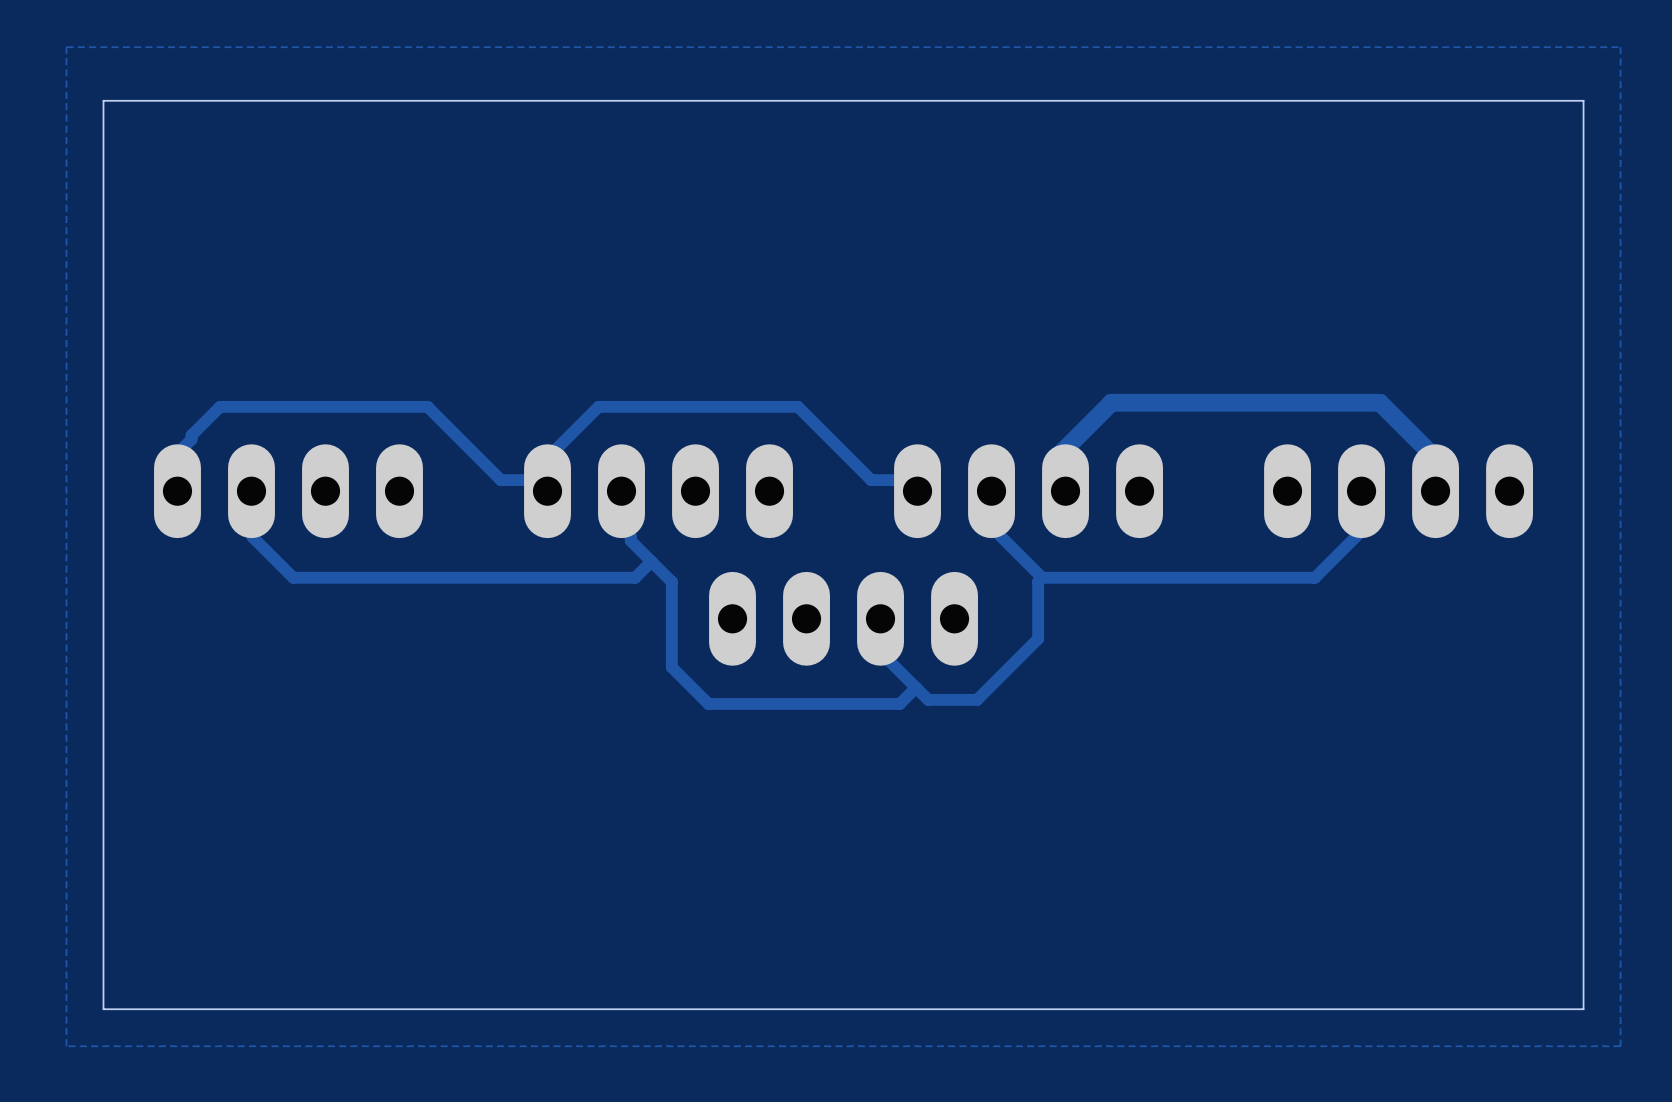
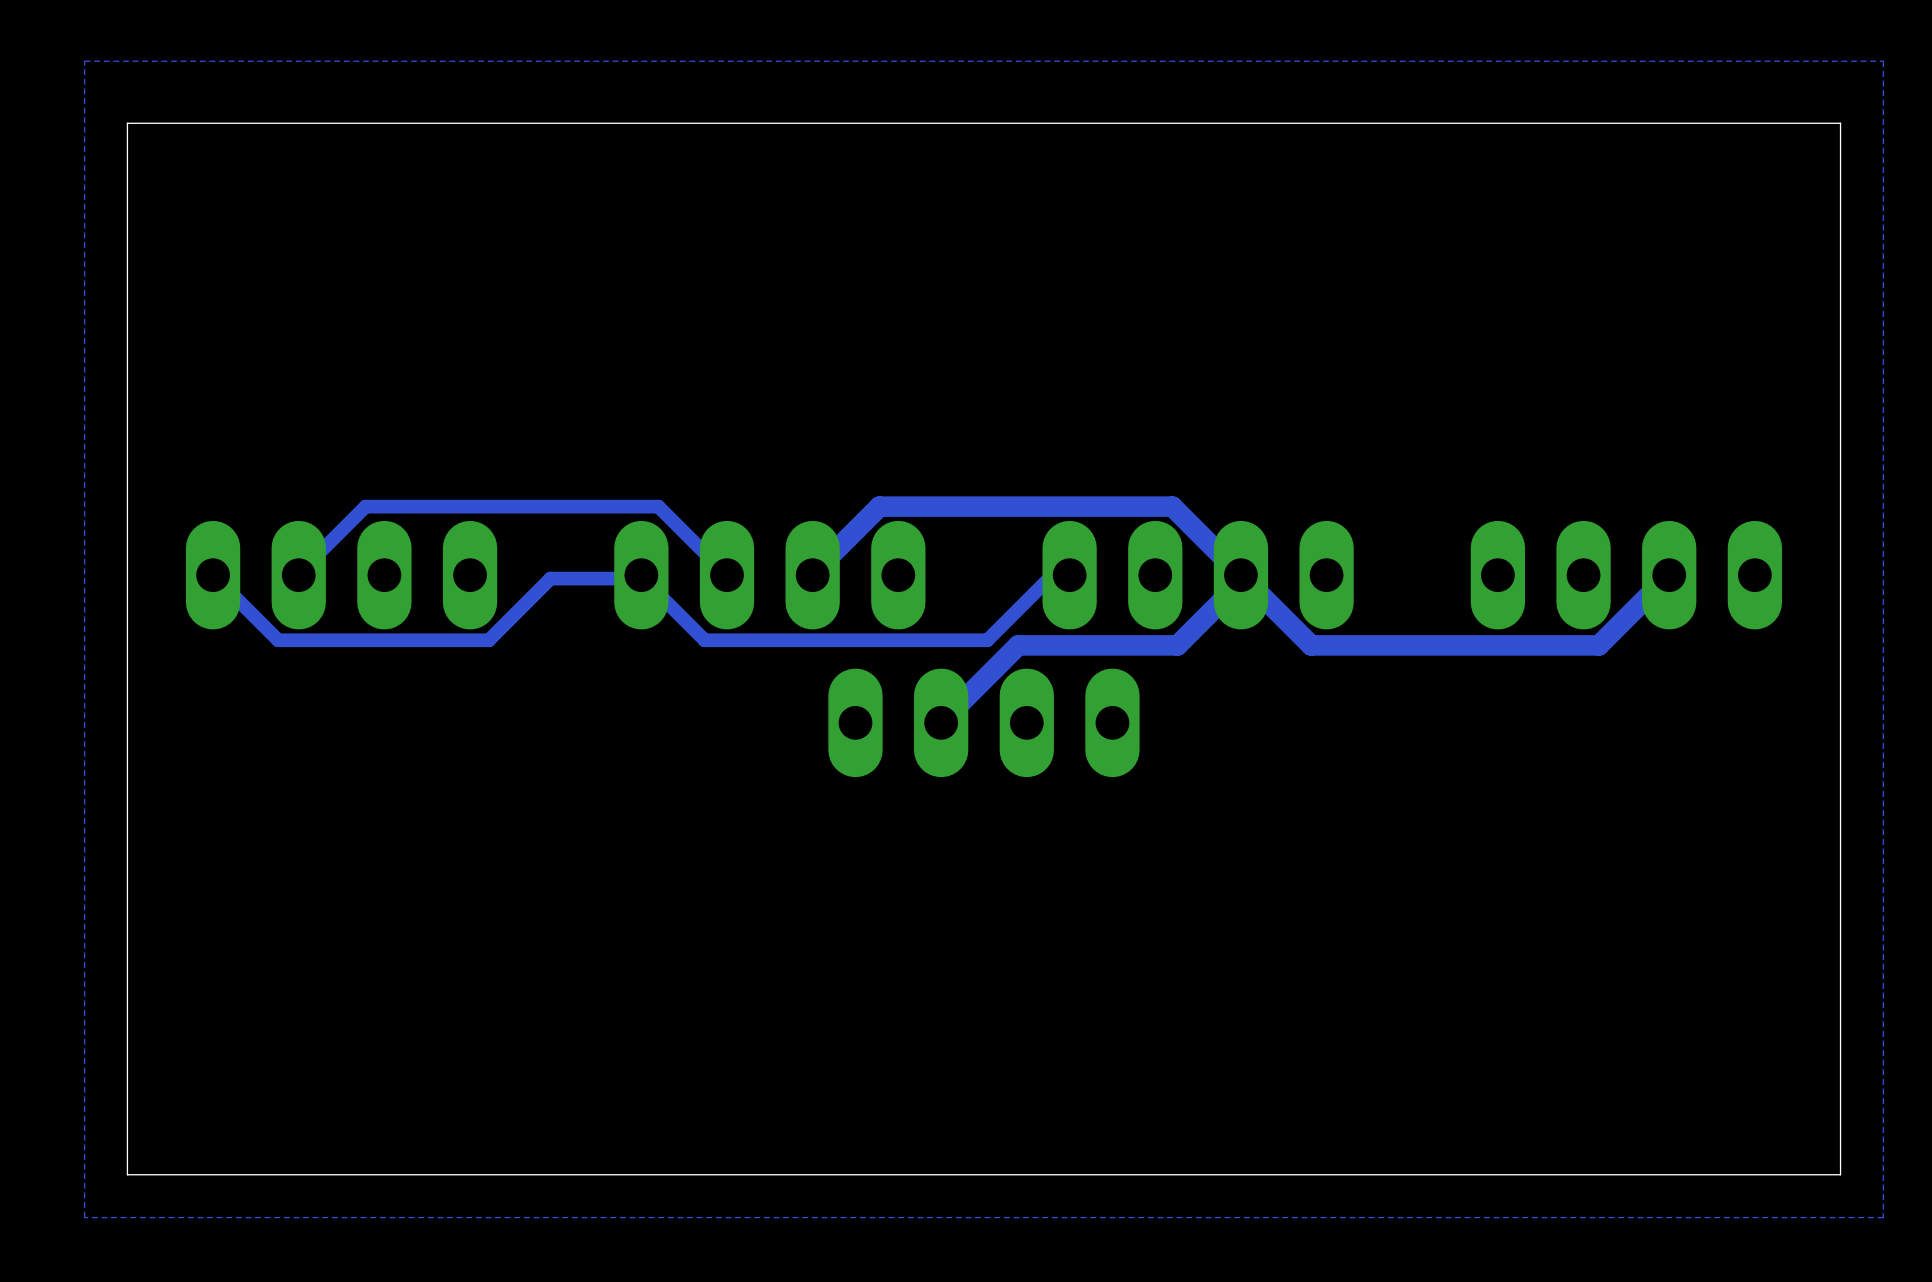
track: (1062, 488) (1062, 451) (1111, 402) (1380, 402) (1432, 455) (1432, 488) (1435, 491) -> (941, 722) (1018, 645) (1177, 645) (1239, 583) (1240, 575) (1311, 645) (1598, 645) (1669, 575)
track: none -> (1237, 571) (1172, 506) (879, 506) (812, 575)
track: (251, 491) (252, 537) (293, 577) (635, 577) (651, 561) -> (298, 575) (365, 506) (658, 506) (727, 575)
track: (621, 491) (622, 528) (631, 537) (631, 541) (671, 581) (671, 667) (708, 703) (899, 703) (916, 687) -> none
track: (917, 491) (907, 480) (871, 480) (798, 406) (598, 406) (549, 455) (549, 488) (547, 491) (545, 480) (500, 480) (427, 406) (220, 406) (191, 435) (191, 439) (179, 451) (179, 488) (177, 491) -> (1069, 575) (1069, 578) (1049, 578) (987, 640) (704, 640) (641, 575) (637, 578) (550, 578) (488, 640) (278, 640) (213, 575)
track: (991, 491) (993, 492) (993, 528) (1042, 577) -> none
track: (1361, 491) (1359, 492) (1359, 533) (1314, 577) (1042, 577) -> none
track: (1042, 577) (1038, 581) (1038, 638) (977, 699) (928, 699) (883, 655) (883, 622) (880, 618) -> none

